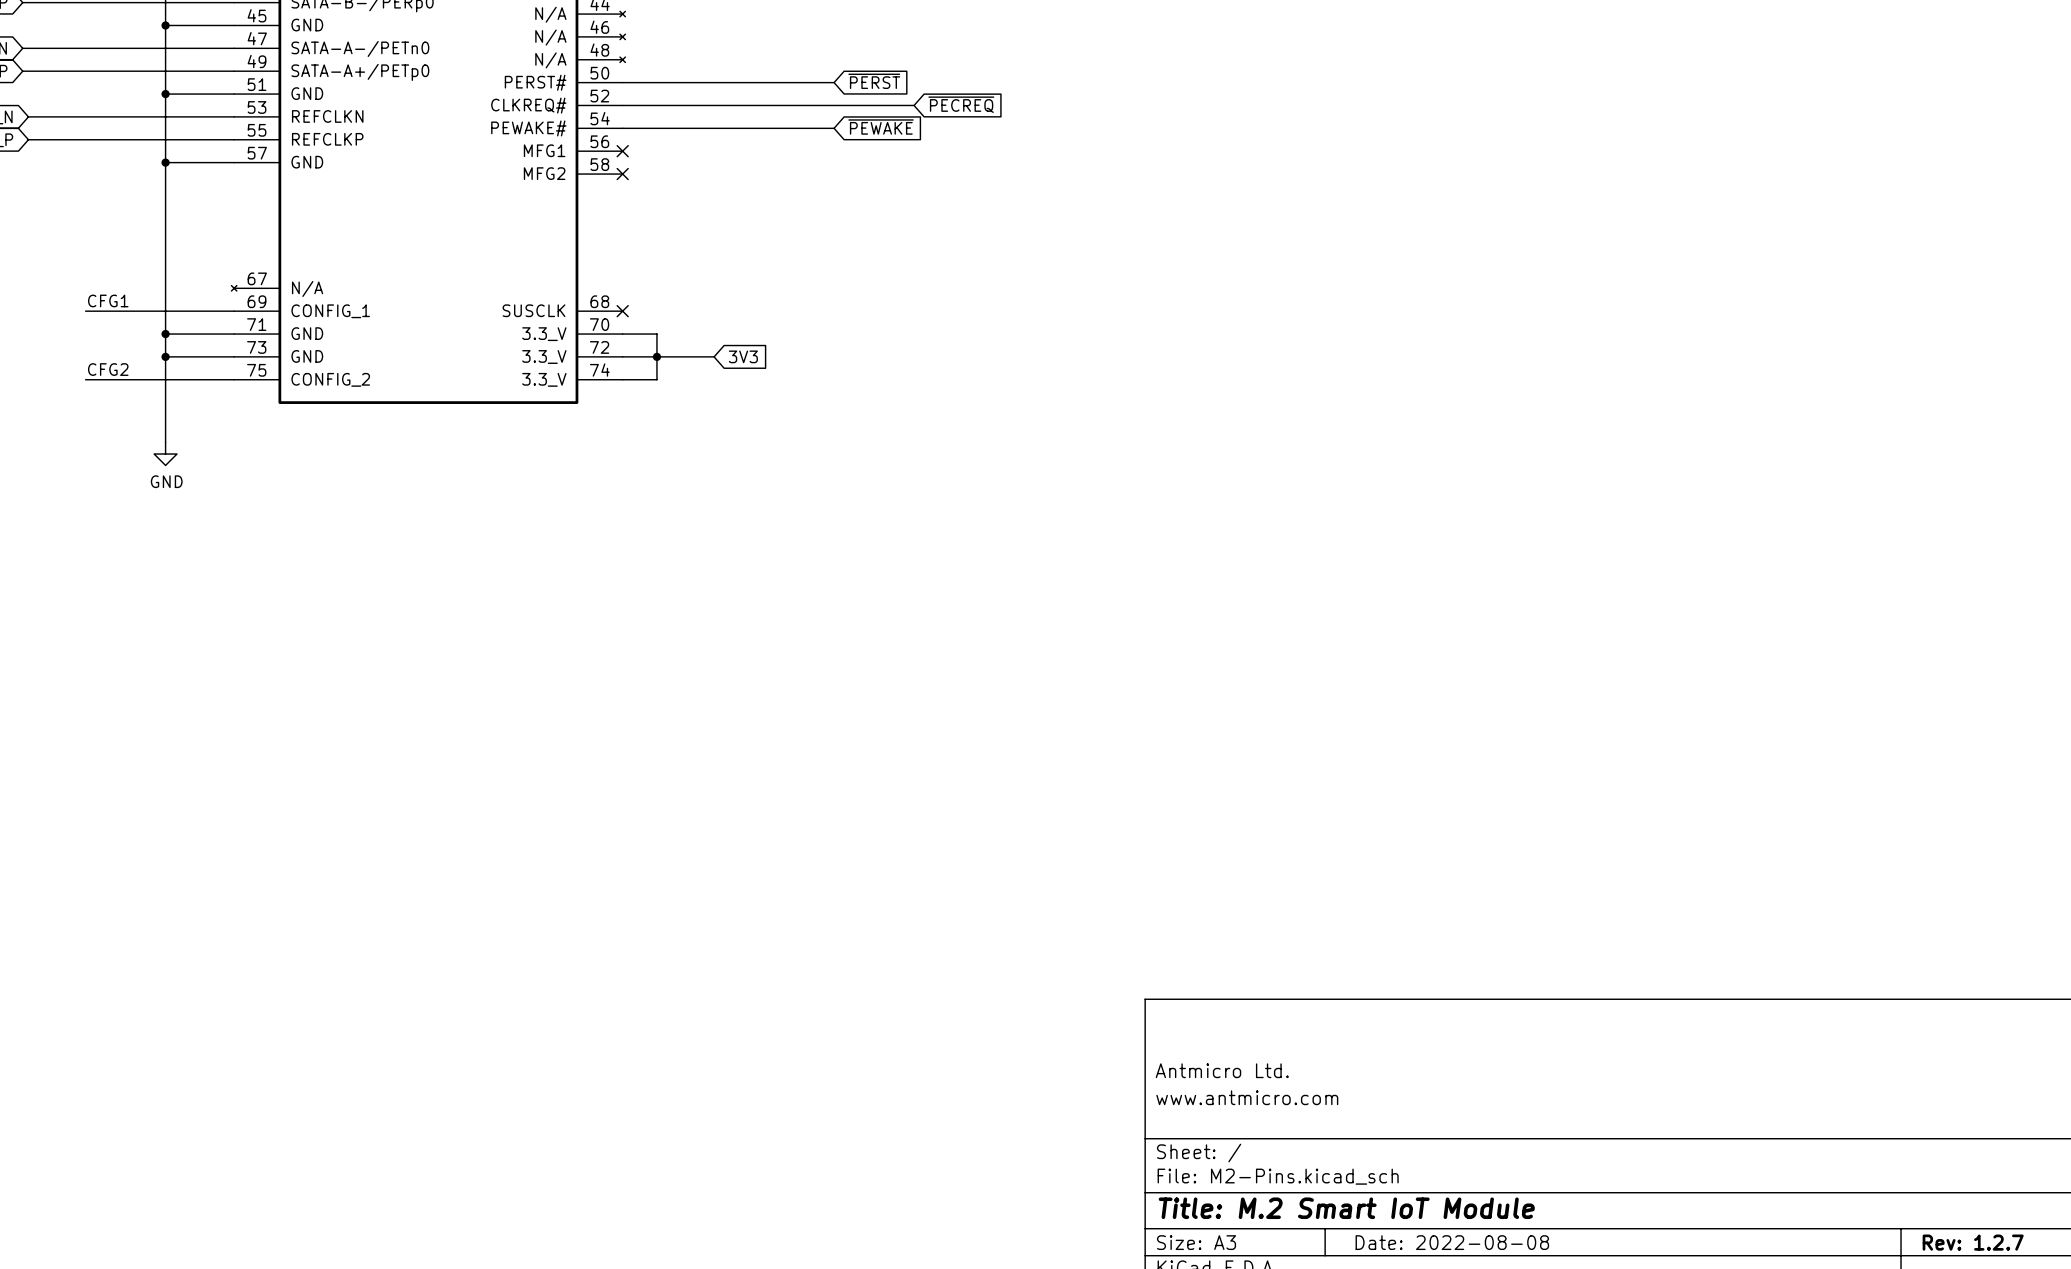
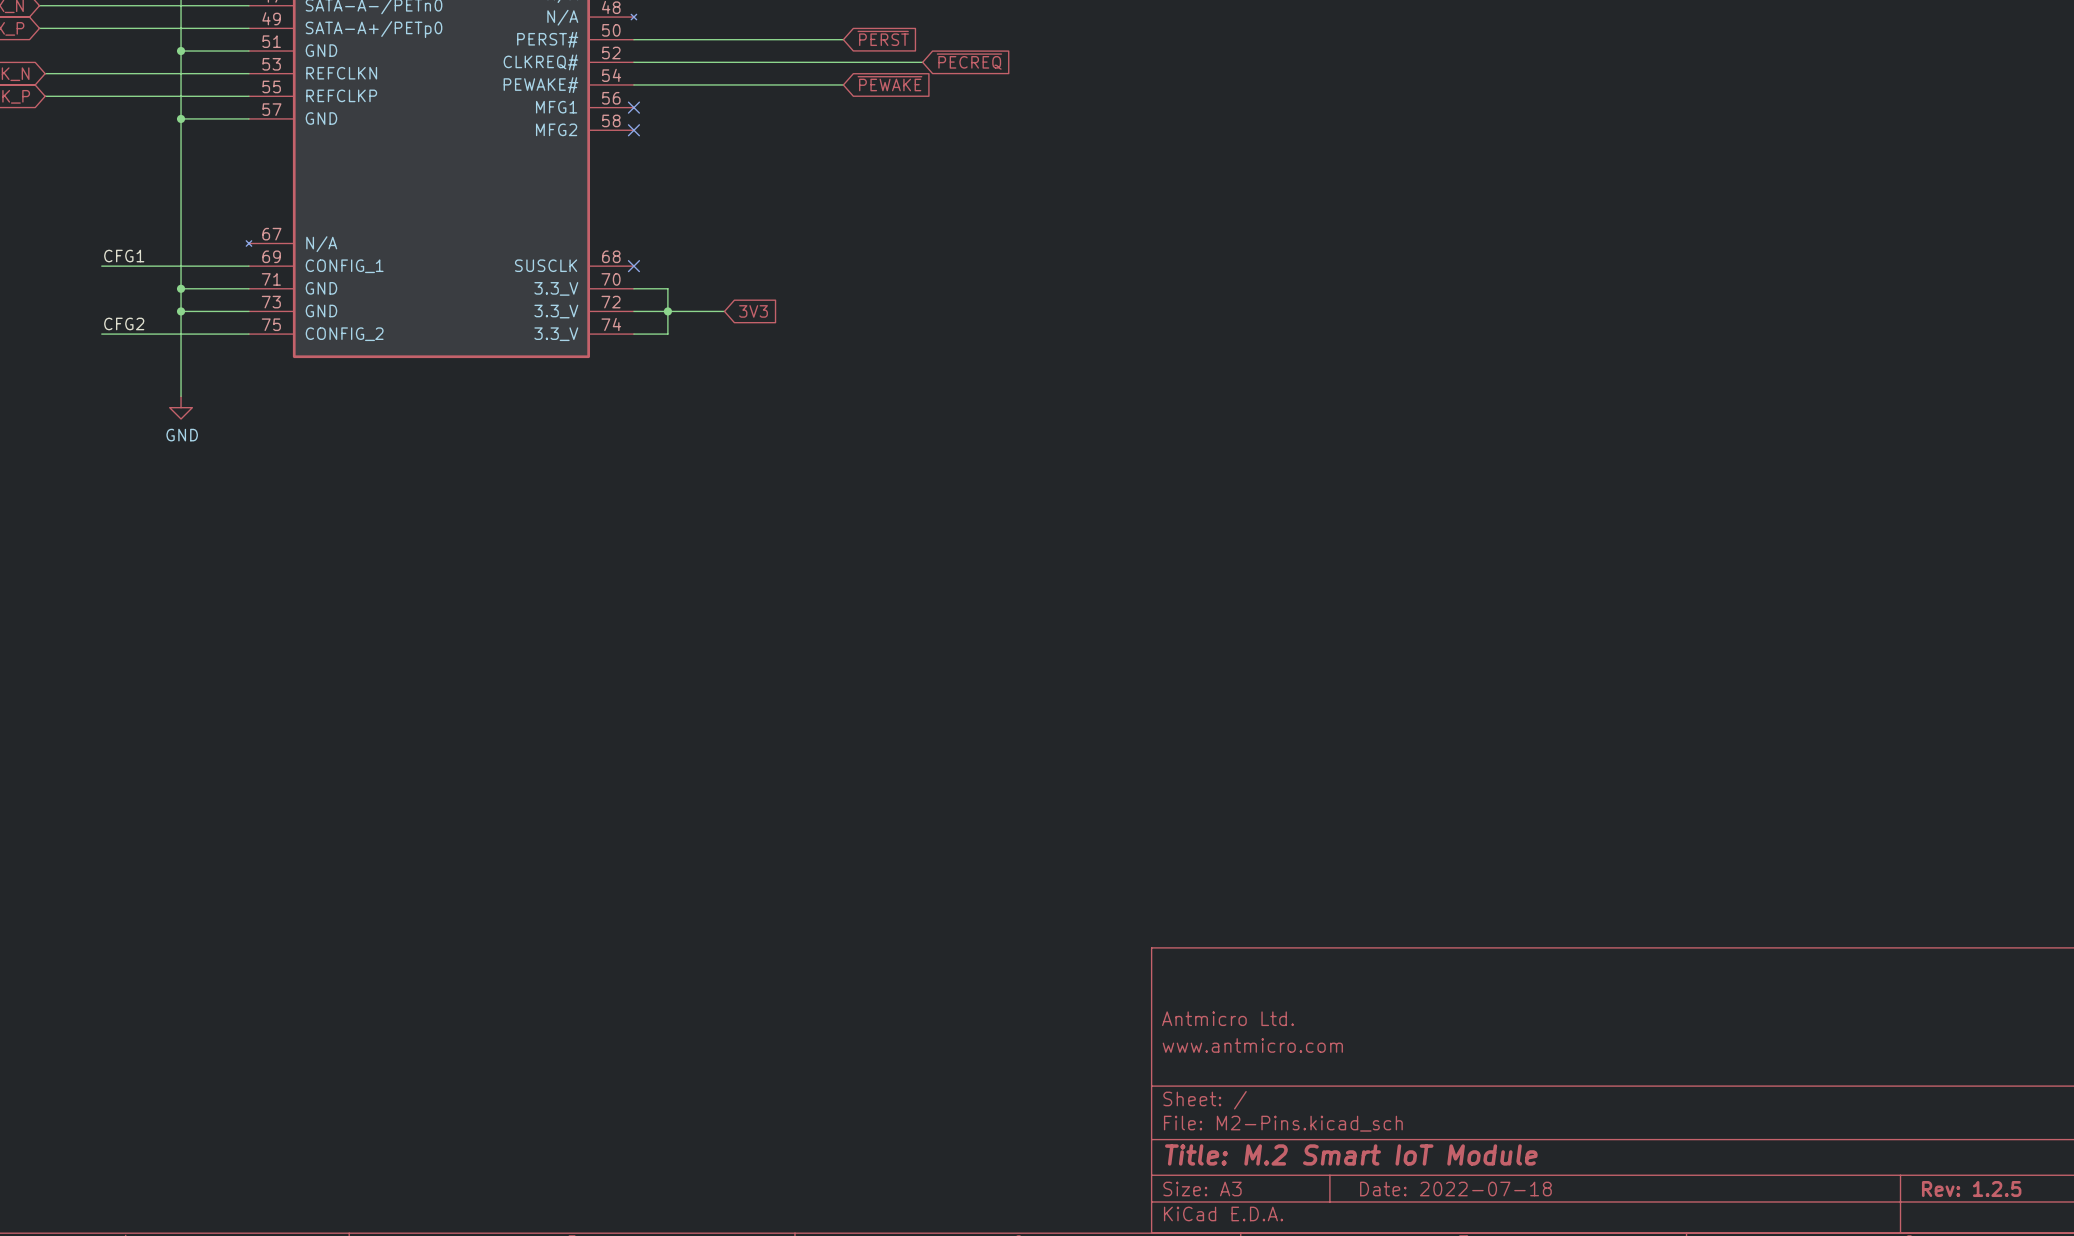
title block: Date: 2022-08-08 (1452, 1242) -> Date: 2022-07-18 (1455, 1189)
title block: Rev: 1.2.7 (1973, 1242) -> Rev: 1.2.5 (1971, 1189)

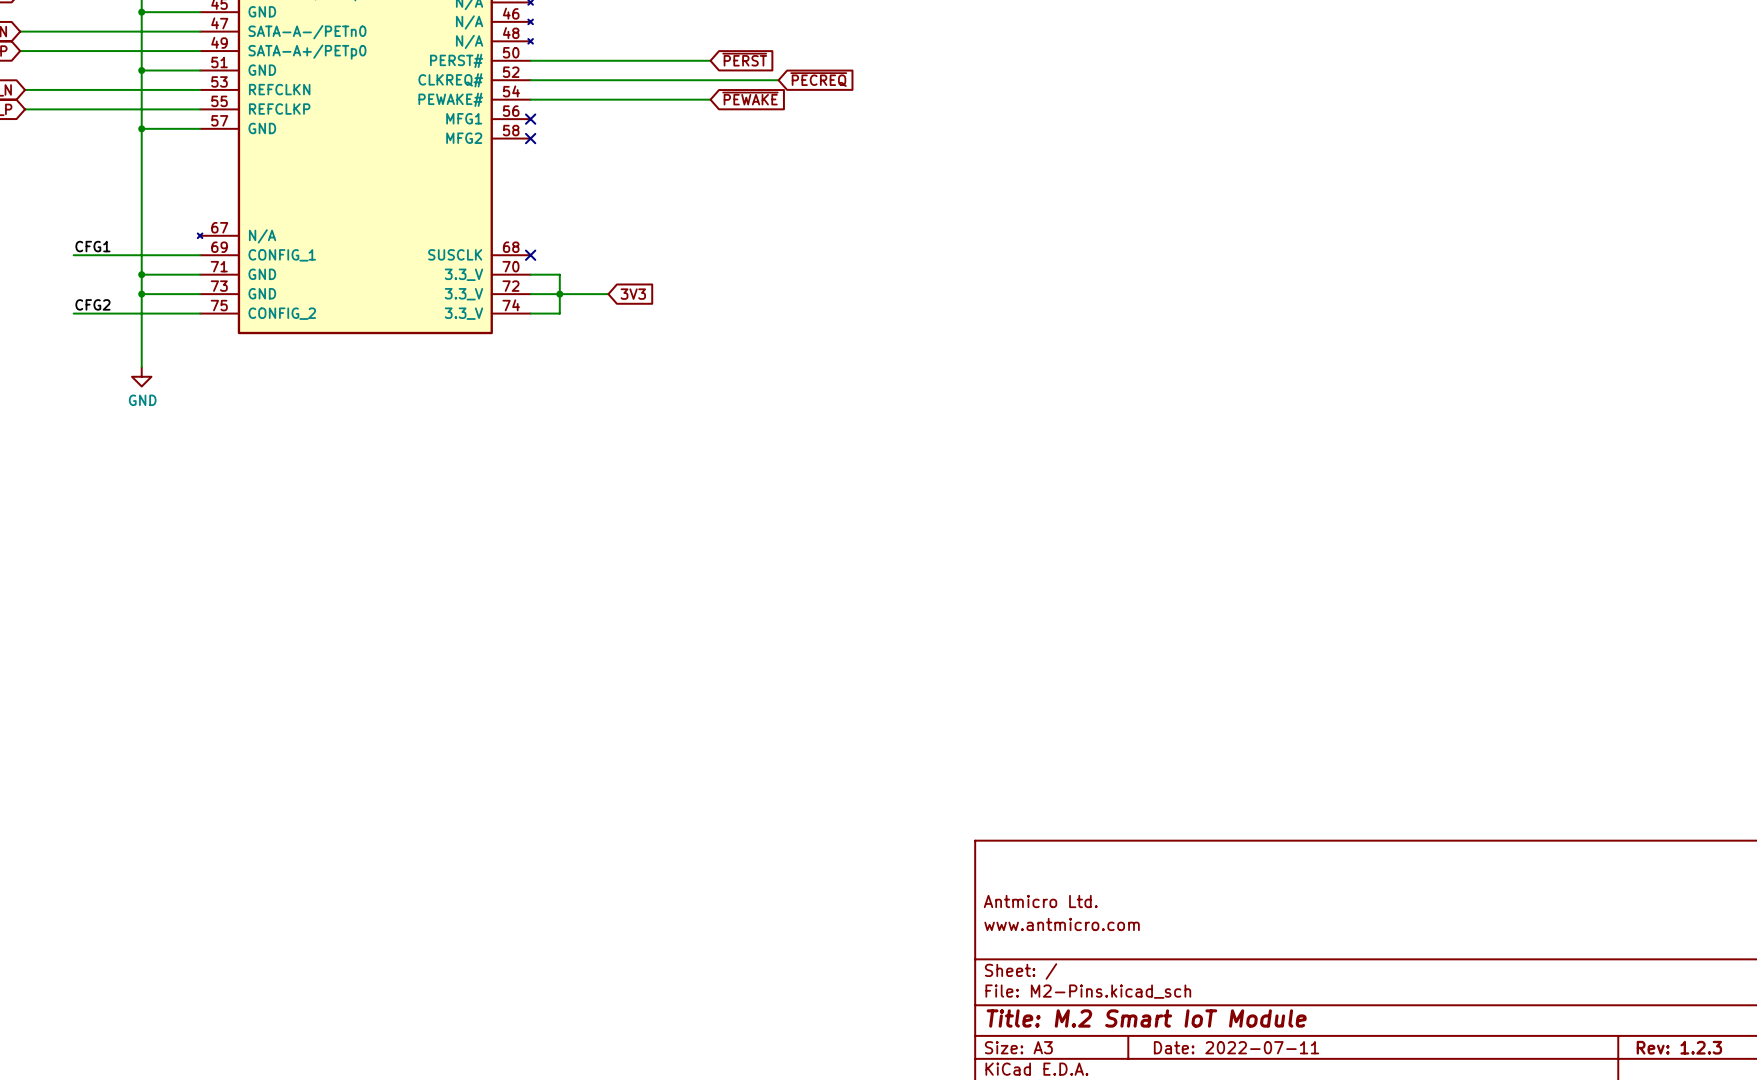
title block: Date: 2022-07-18 (1455, 1189) -> Date: 2022-07-11 (1236, 1047)
title block: Rev: 1.2.5 (1971, 1189) -> Rev: 1.2.3 (1679, 1047)

